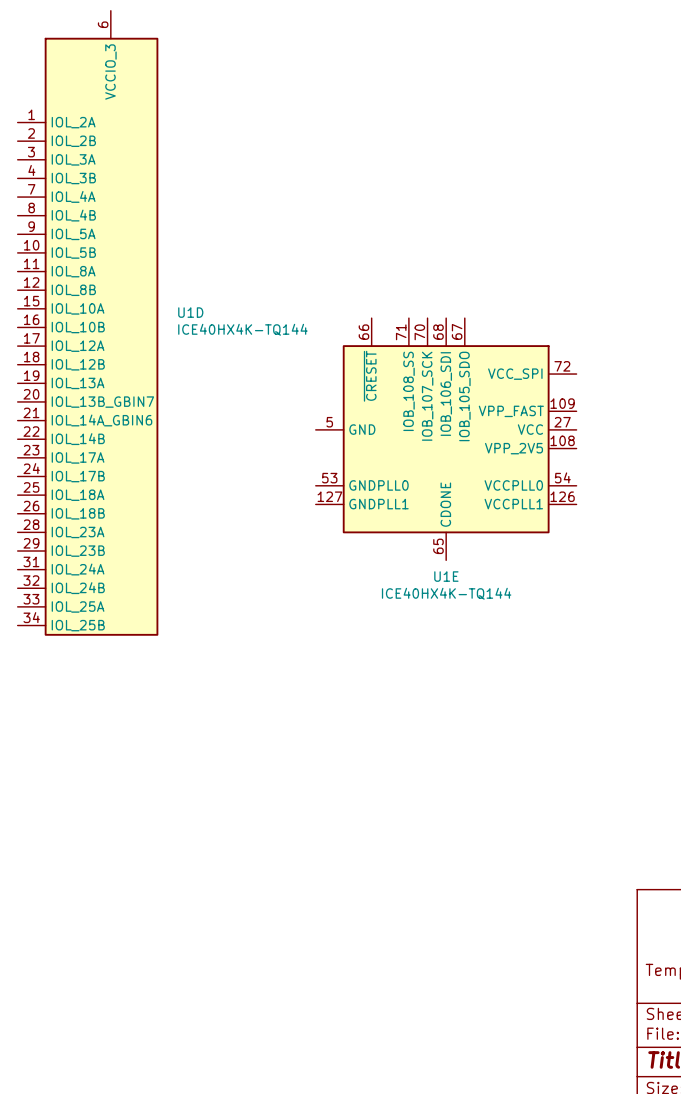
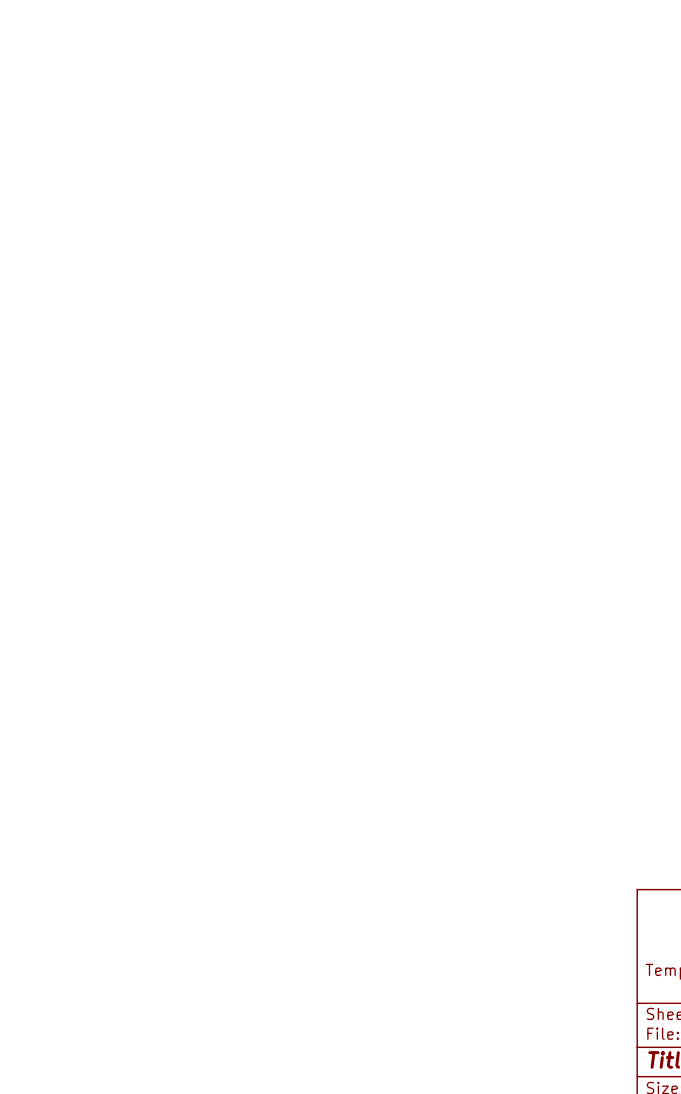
U1D: ICE40HX4K-TQ144 (88, 323) -> none
U1E: ICE40HX4K-TQ144 (446, 439) -> none

